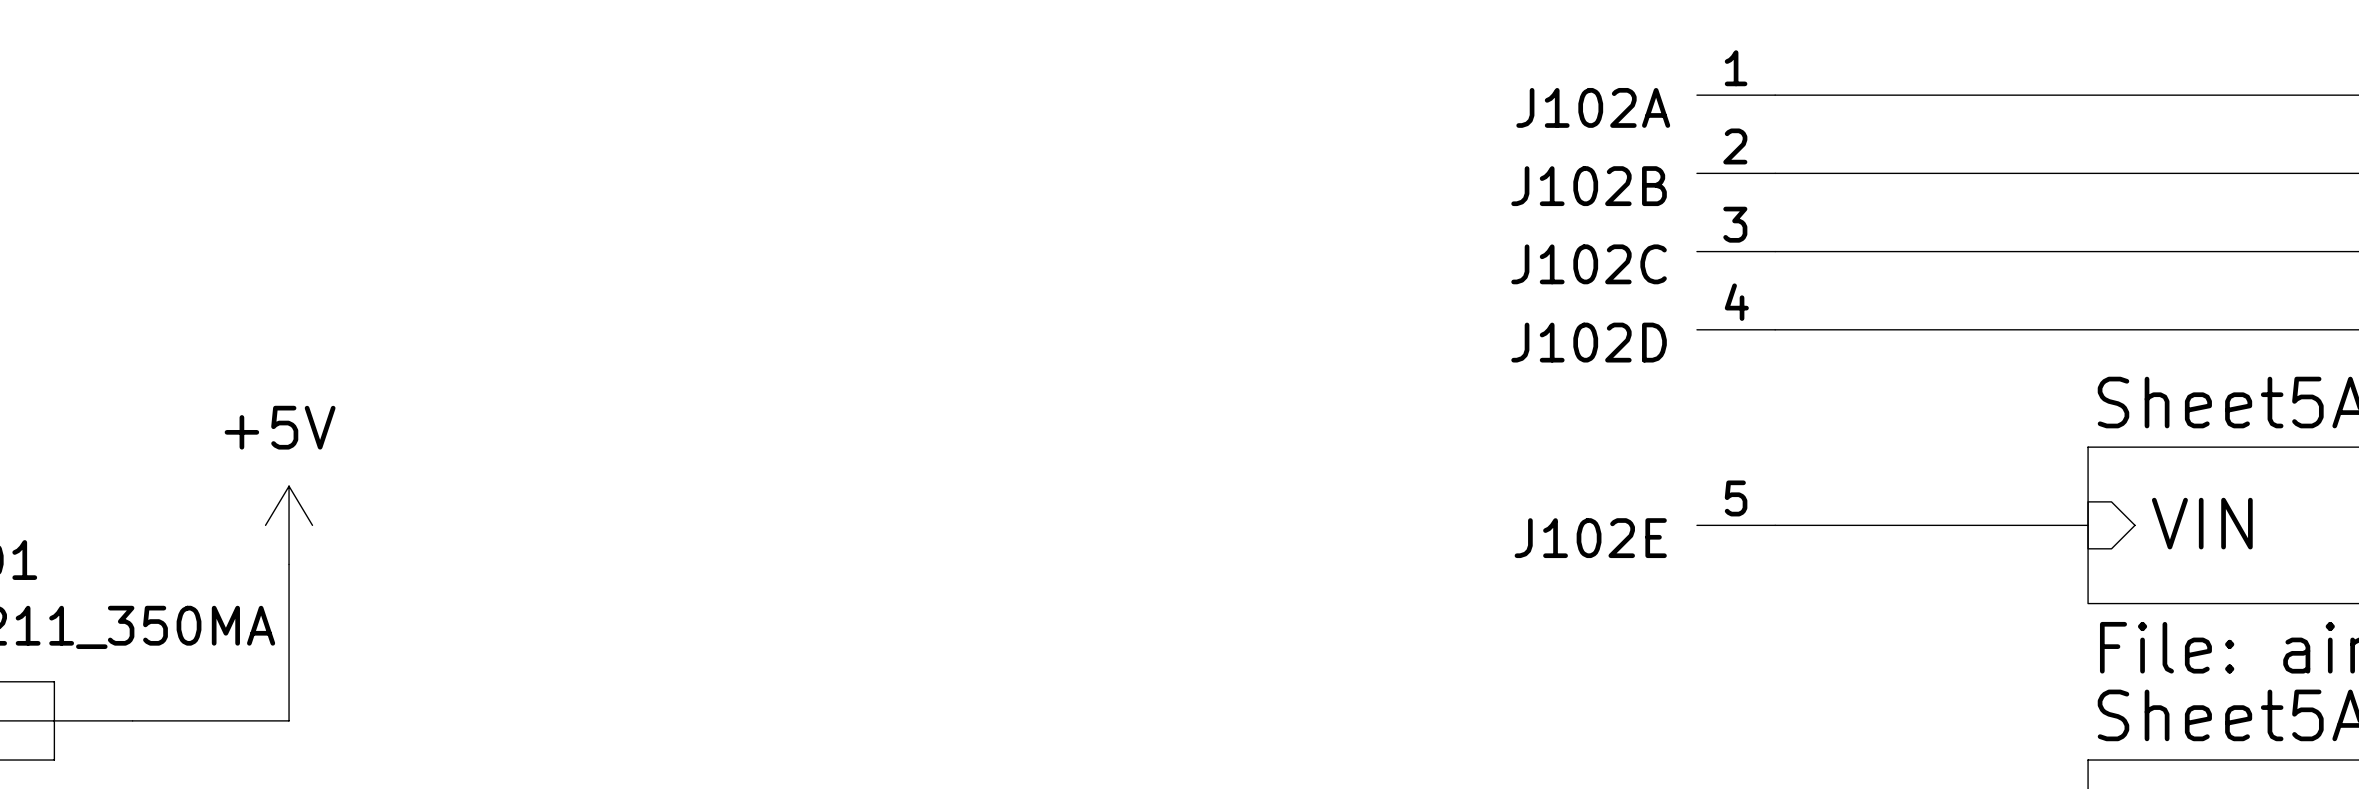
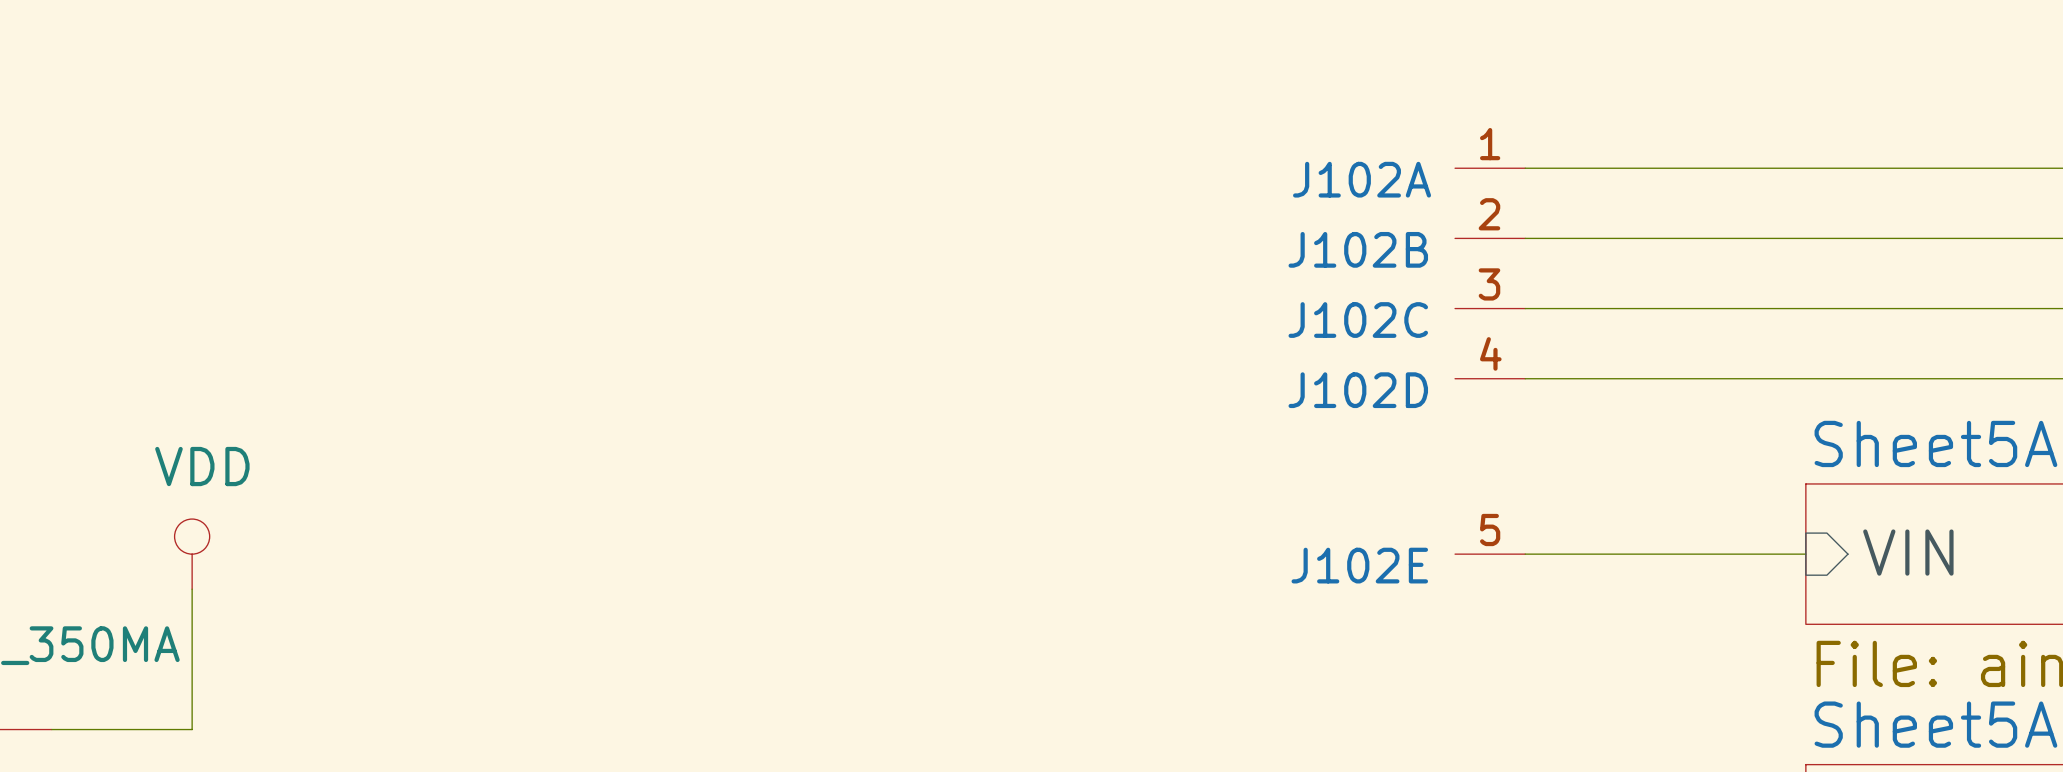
power symbol: +5V (289, 525) -> VDD (192, 554)

